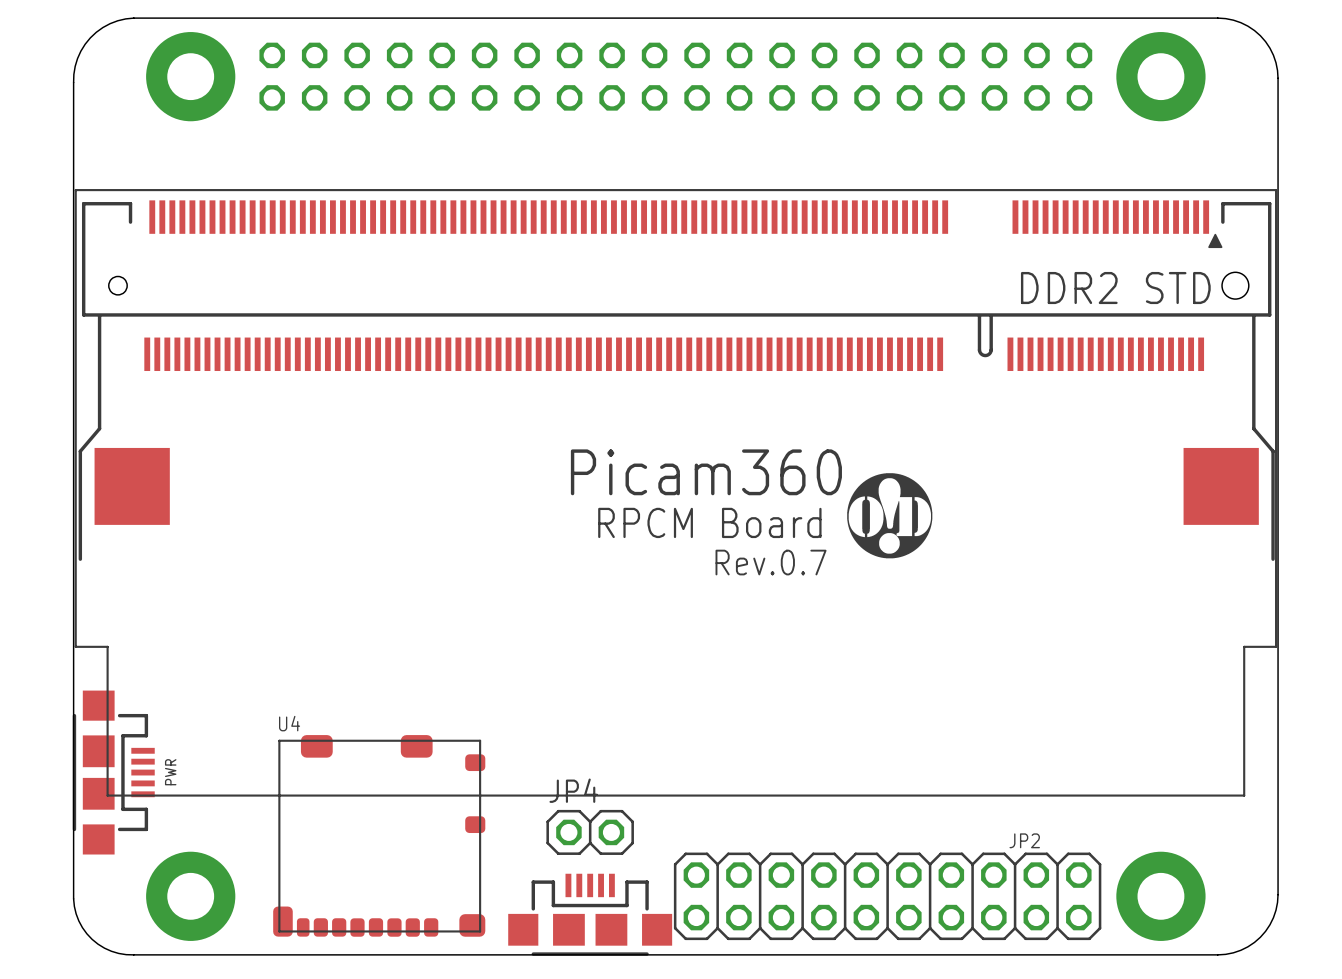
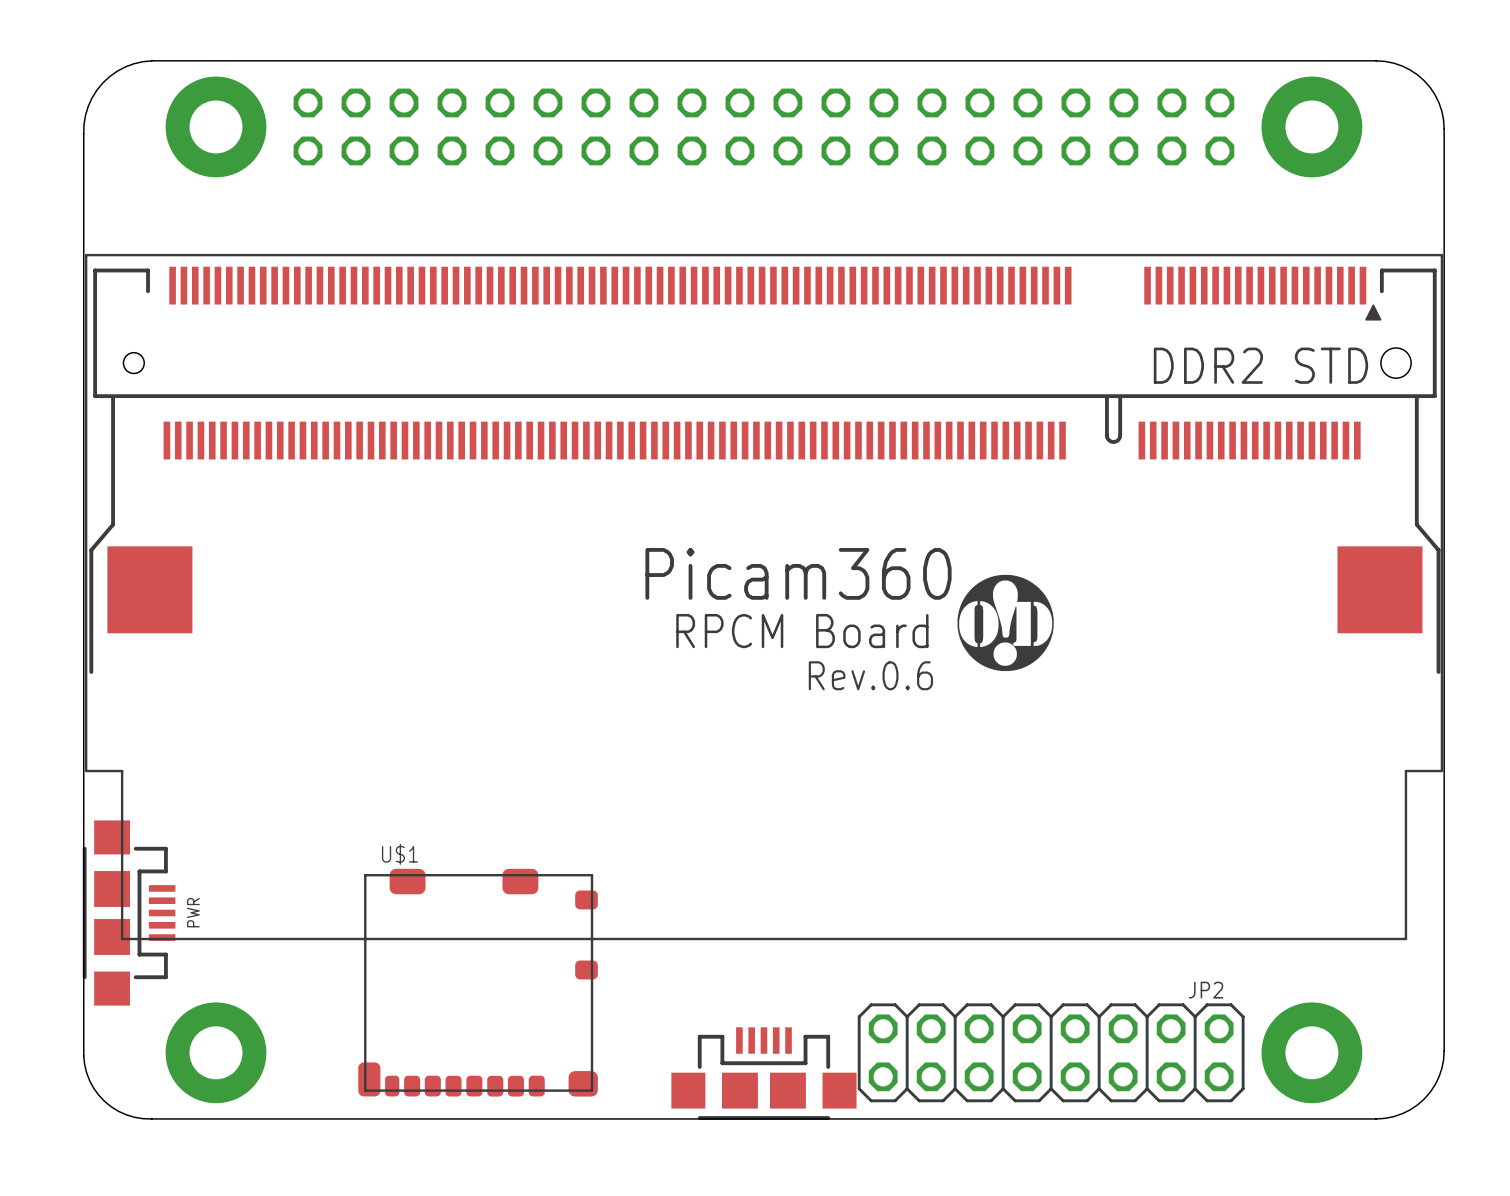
text: Rev.0.7 (771, 562) -> Rev.0.6 (870, 675)
JP4: (590, 832) -> none
U$1: none -> (478, 982)
U4: (379, 835) -> none
JP2 footprint: [673, 852, 1102, 941] -> [857, 1003, 1245, 1103]
part position: (590, 914) -> (763, 1073)

